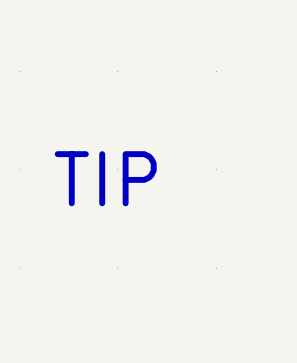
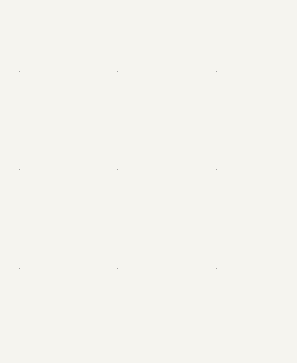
text: TIP (105, 178) -> none

